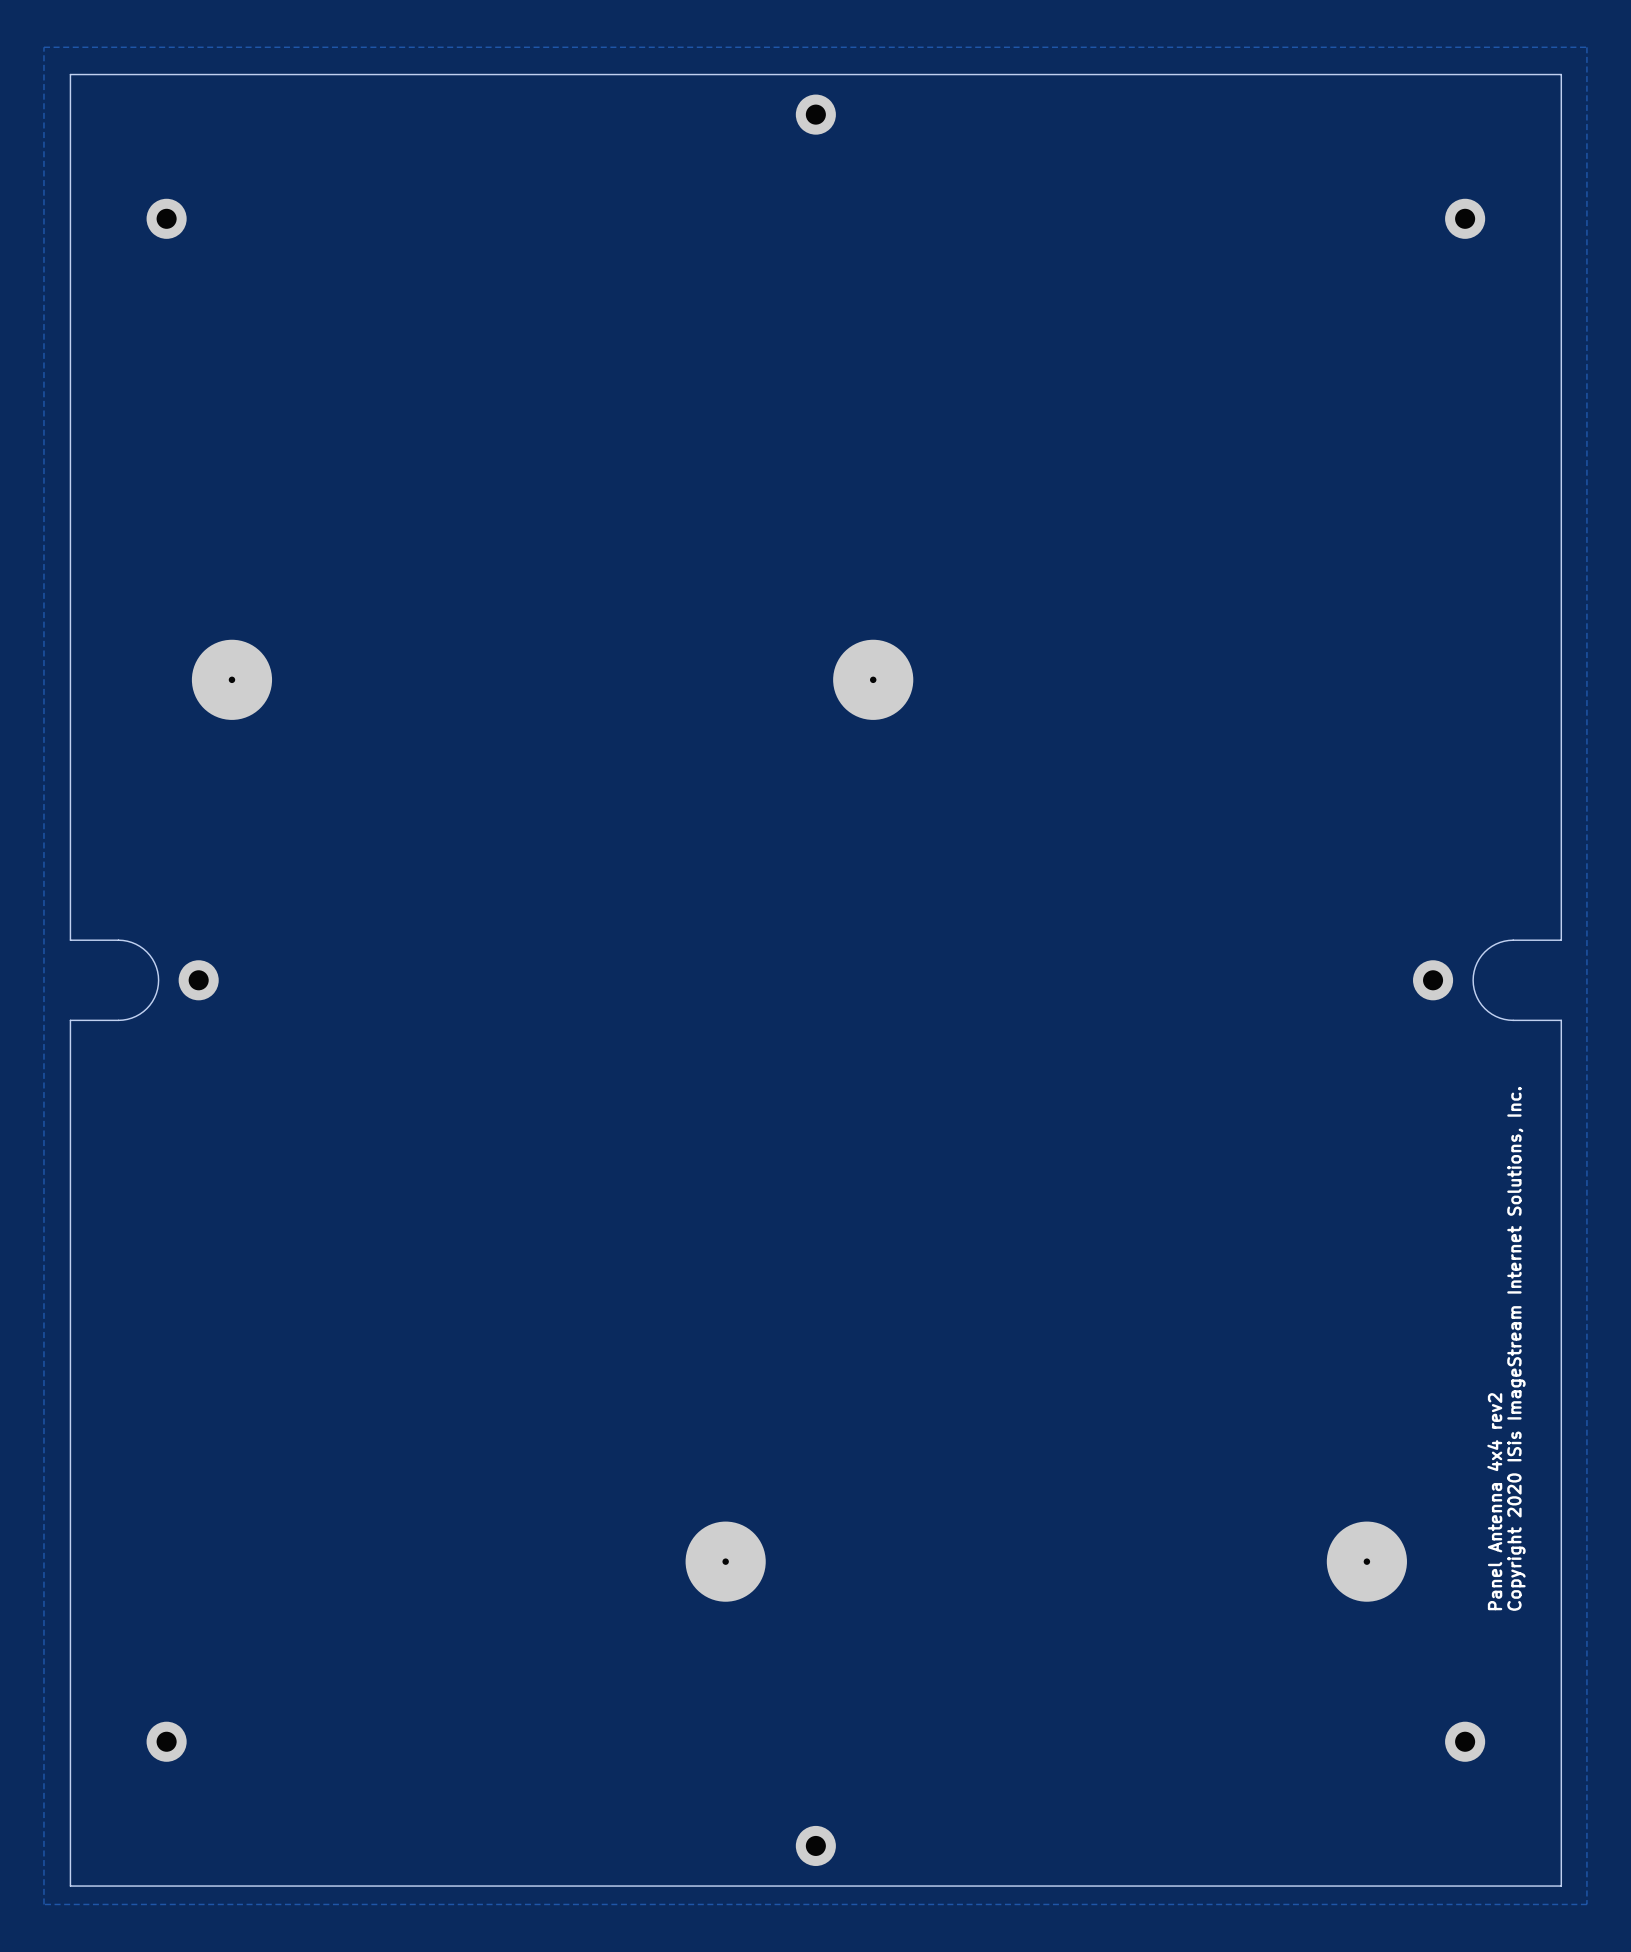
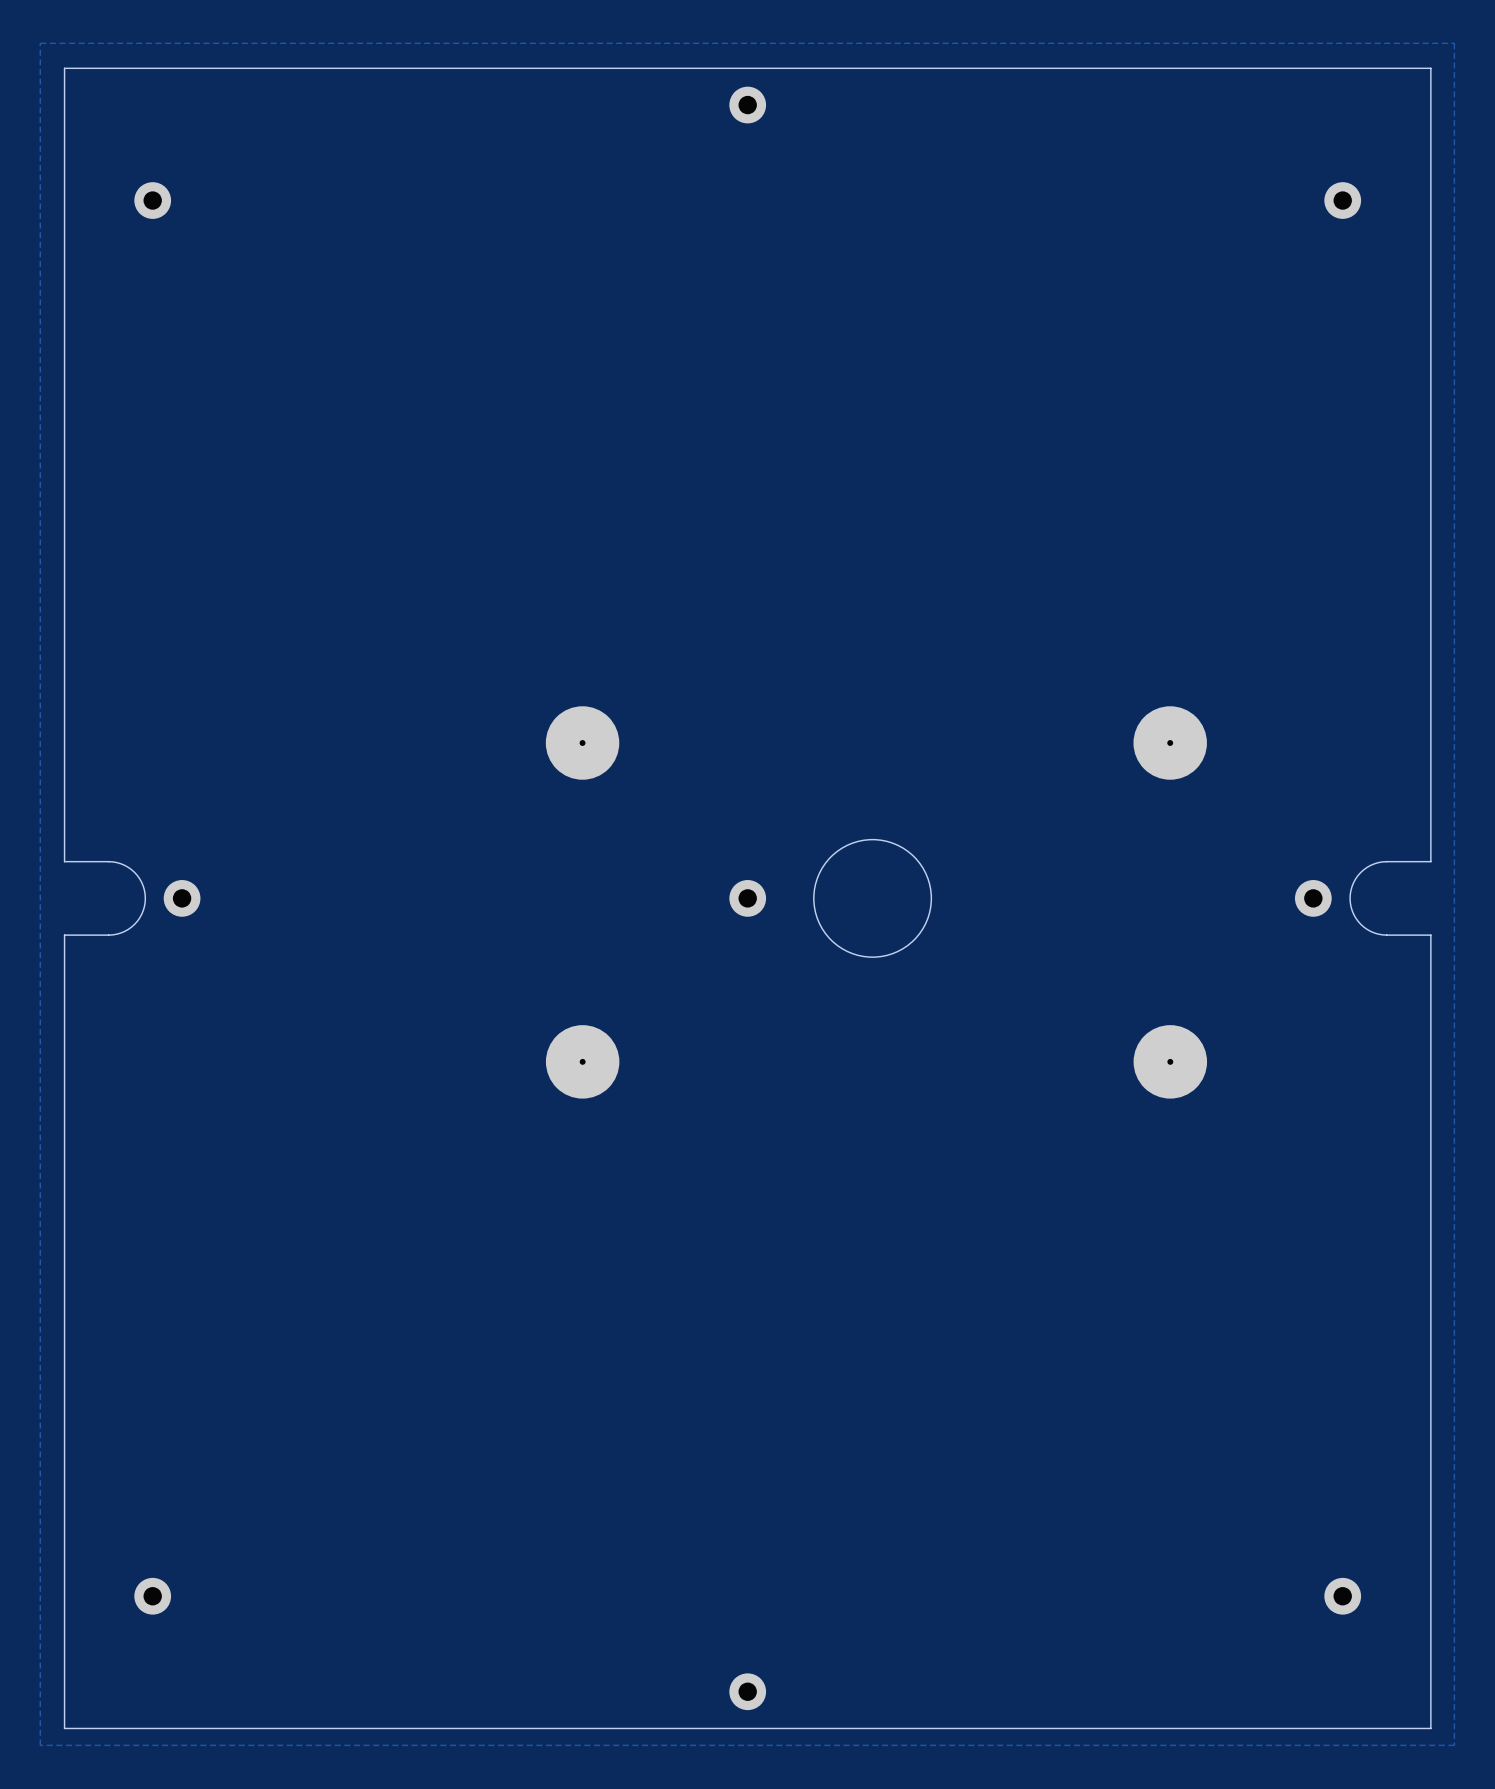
part: (231, 679) -> none
part: (873, 679) -> none
part: none -> (582, 743)
part: none -> (1170, 743)
round board edge: none -> [813, 839, 932, 958]
part: none -> (747, 898)
part: none -> (582, 1061)
part: none -> (1170, 1061)
text: Copyright 2020 ISis ImageStream Internet Solutions, Inc. (1516, 1348) -> none
text: Panel Antenna 4x4 rev2 (1494, 1501) -> none
part: (725, 1561) -> none
part: (1366, 1561) -> none

